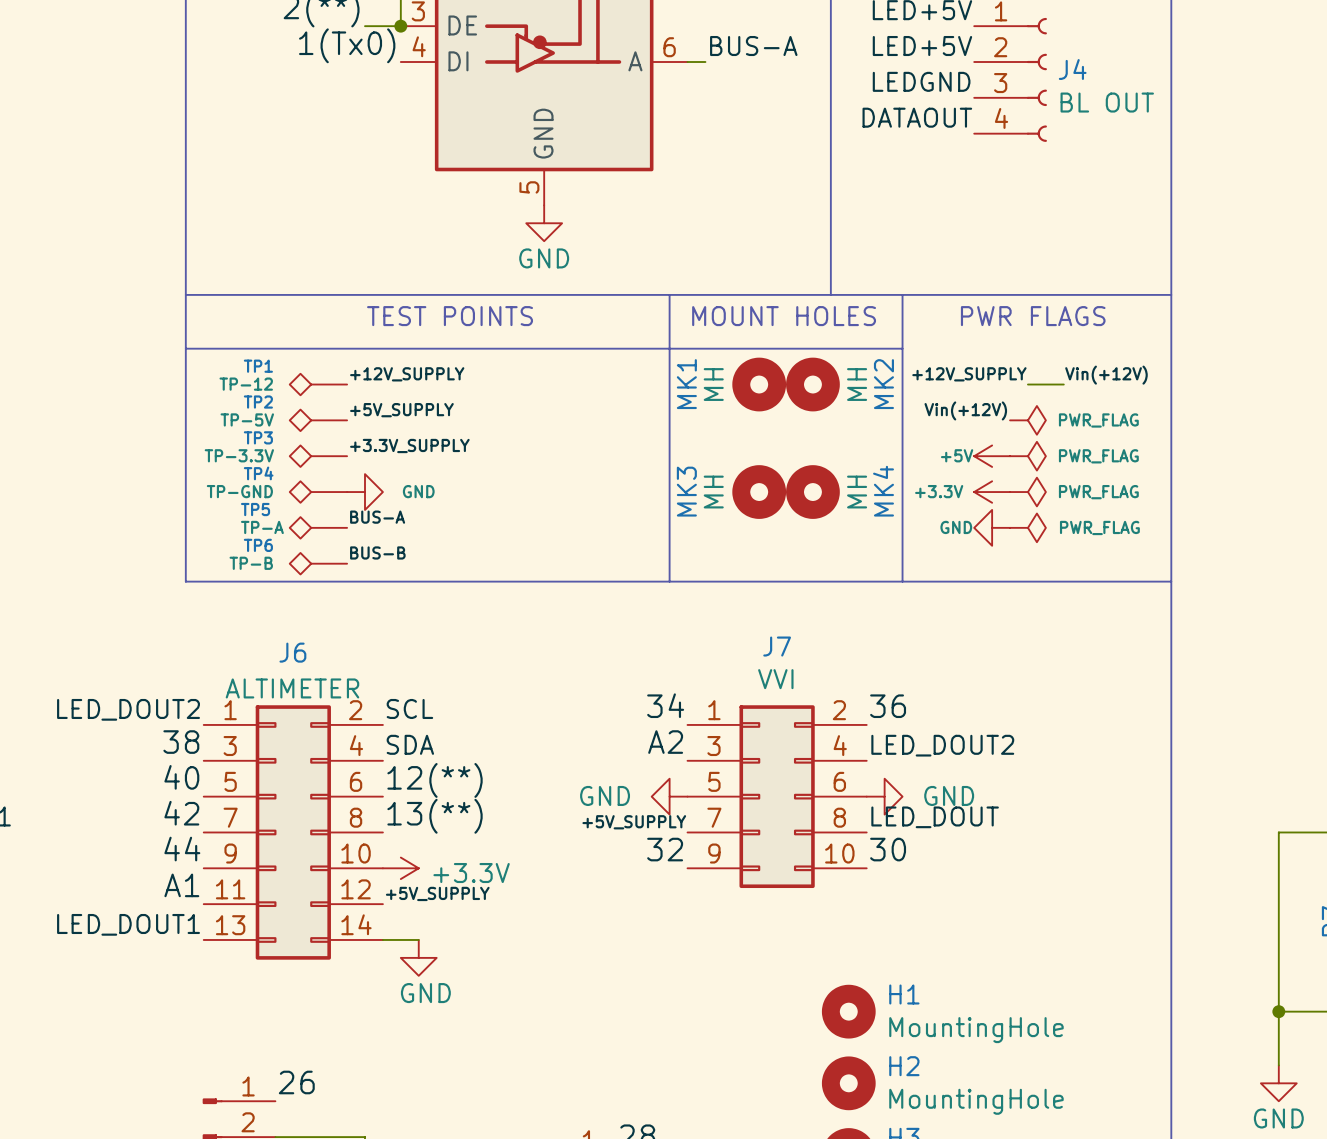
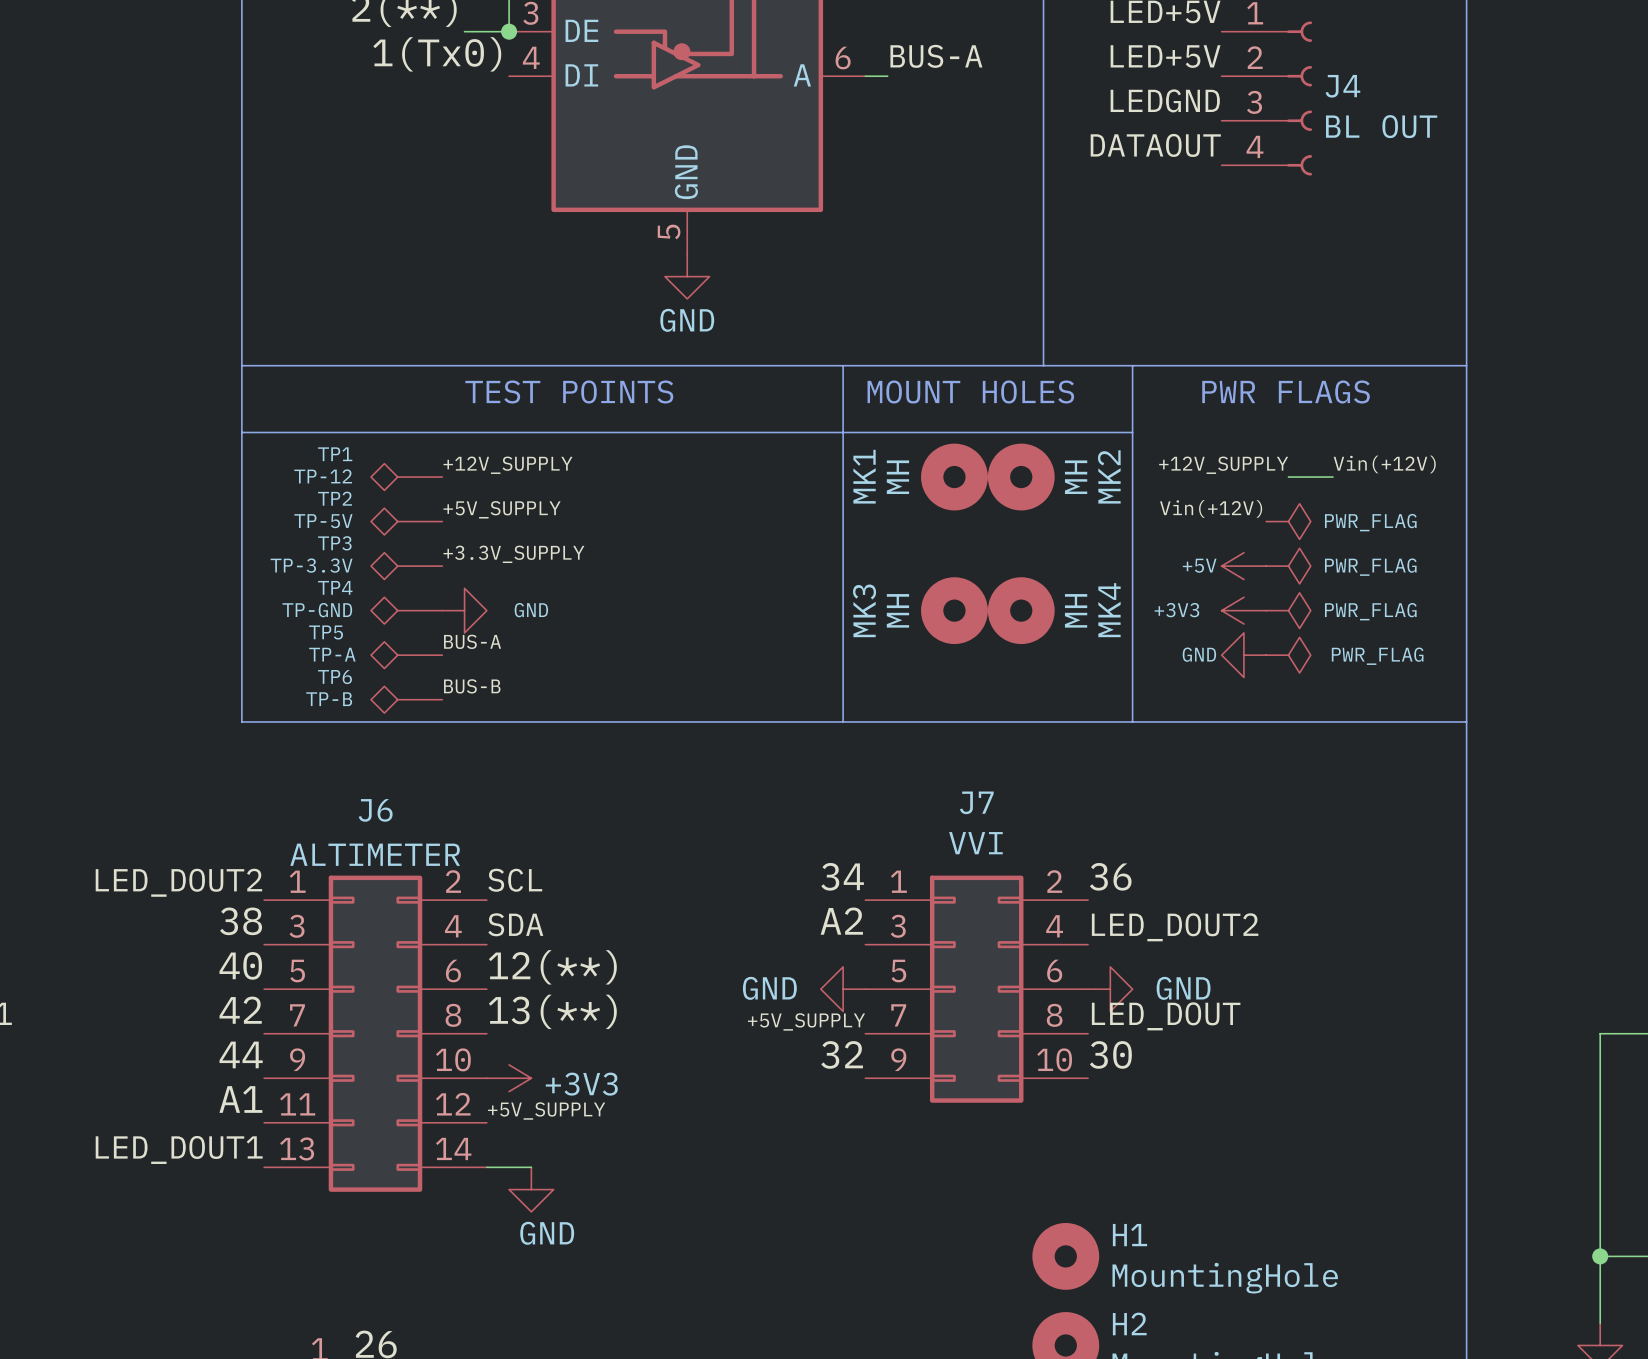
power symbol: +3.3V (992, 492) -> +3V3 (1243, 610)
power symbol: +3.3V (400, 868) -> +3V3 (509, 1078)

